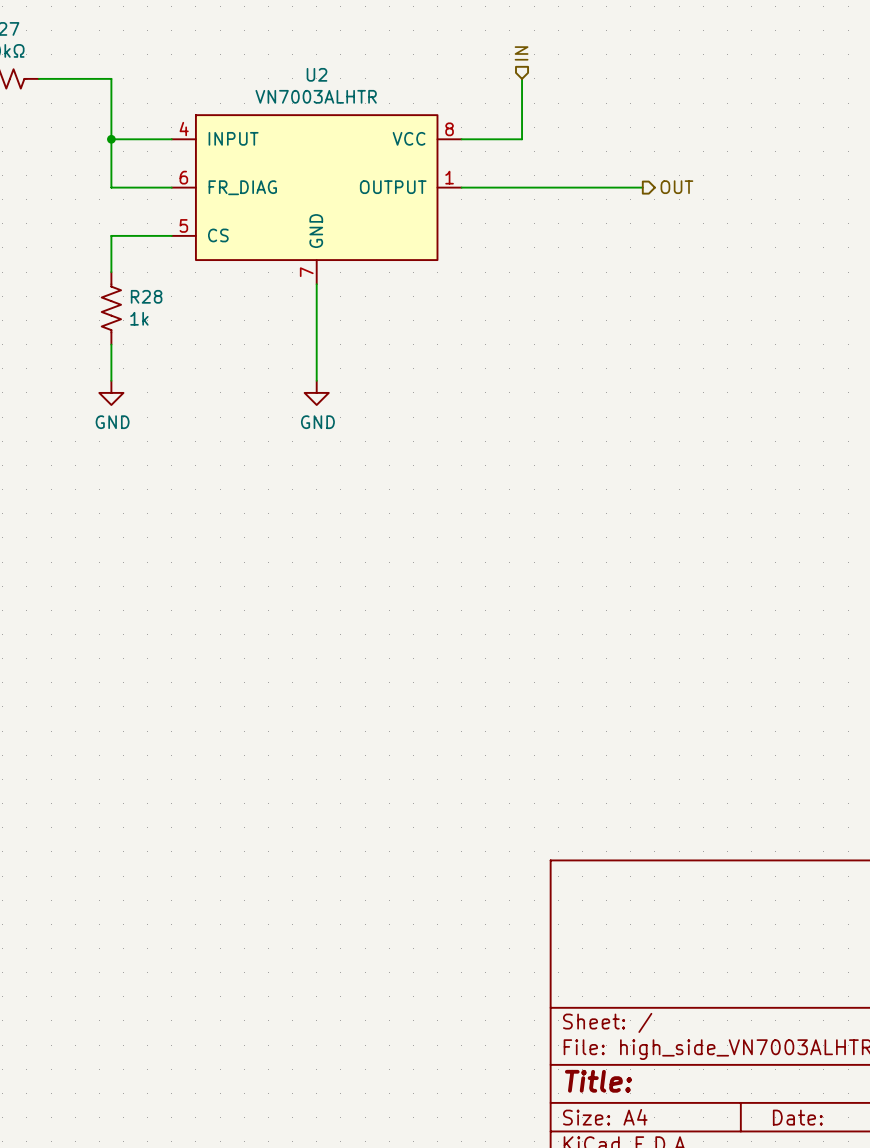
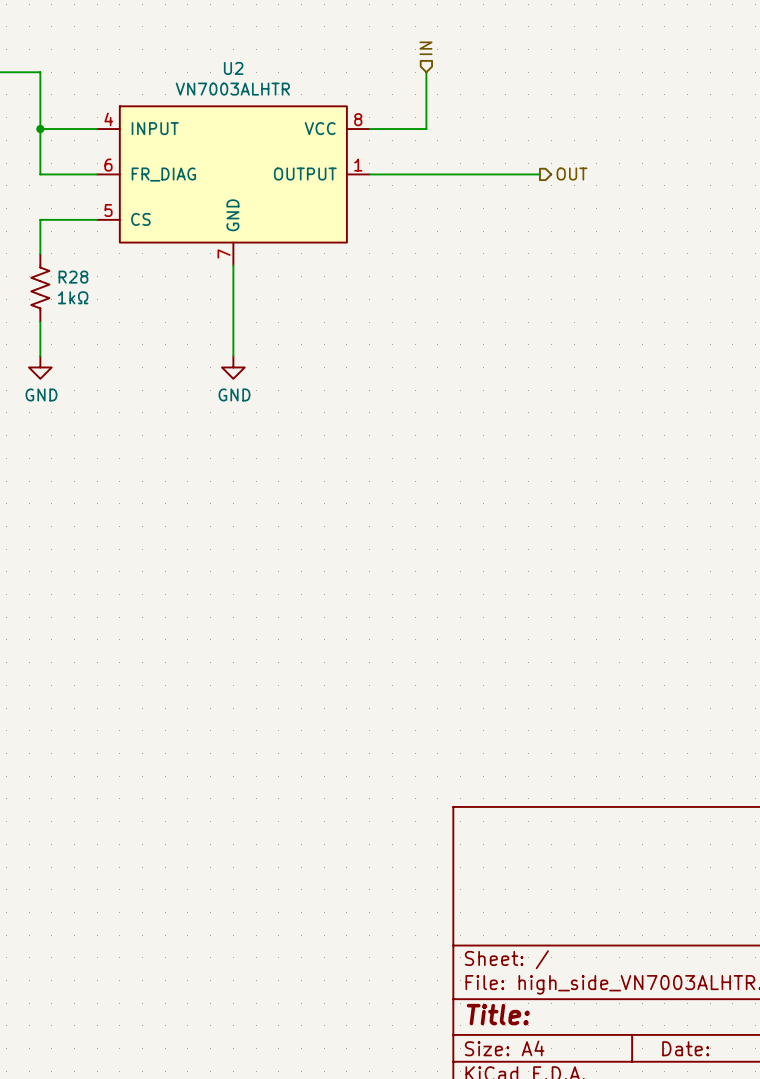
R28 value: 1k (139, 318) -> 1kΩ (73, 297)

